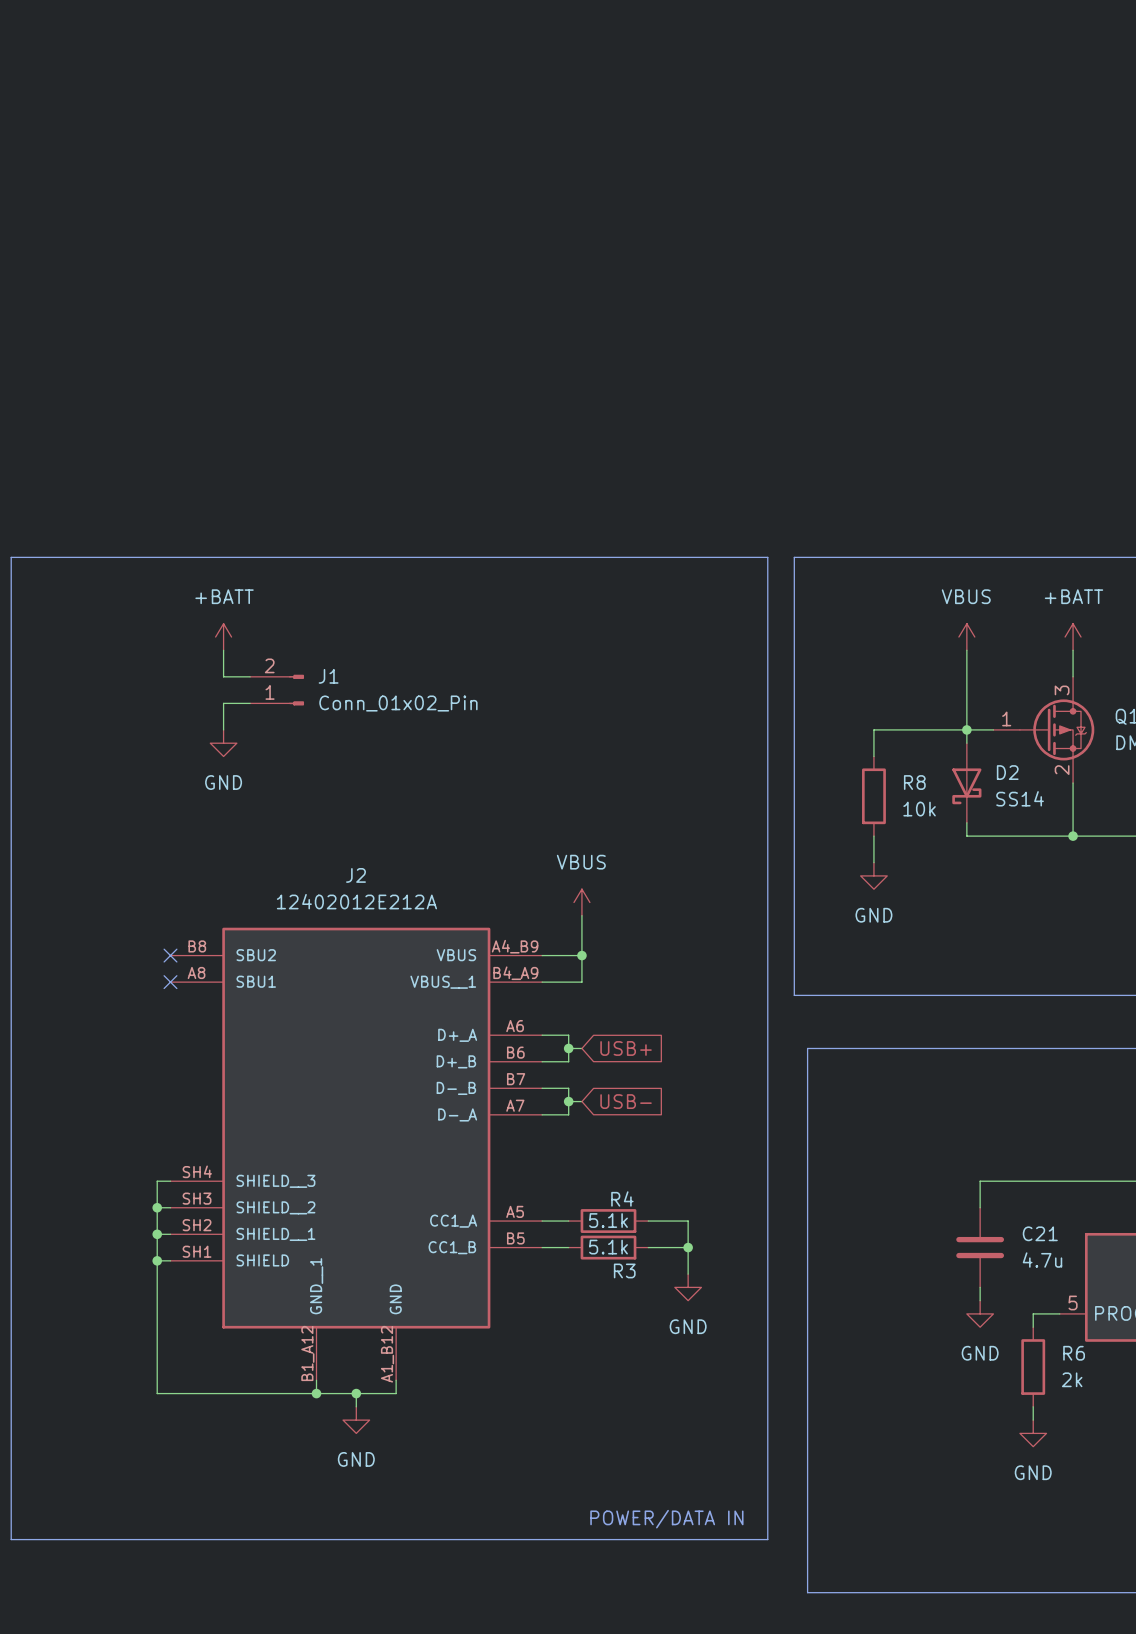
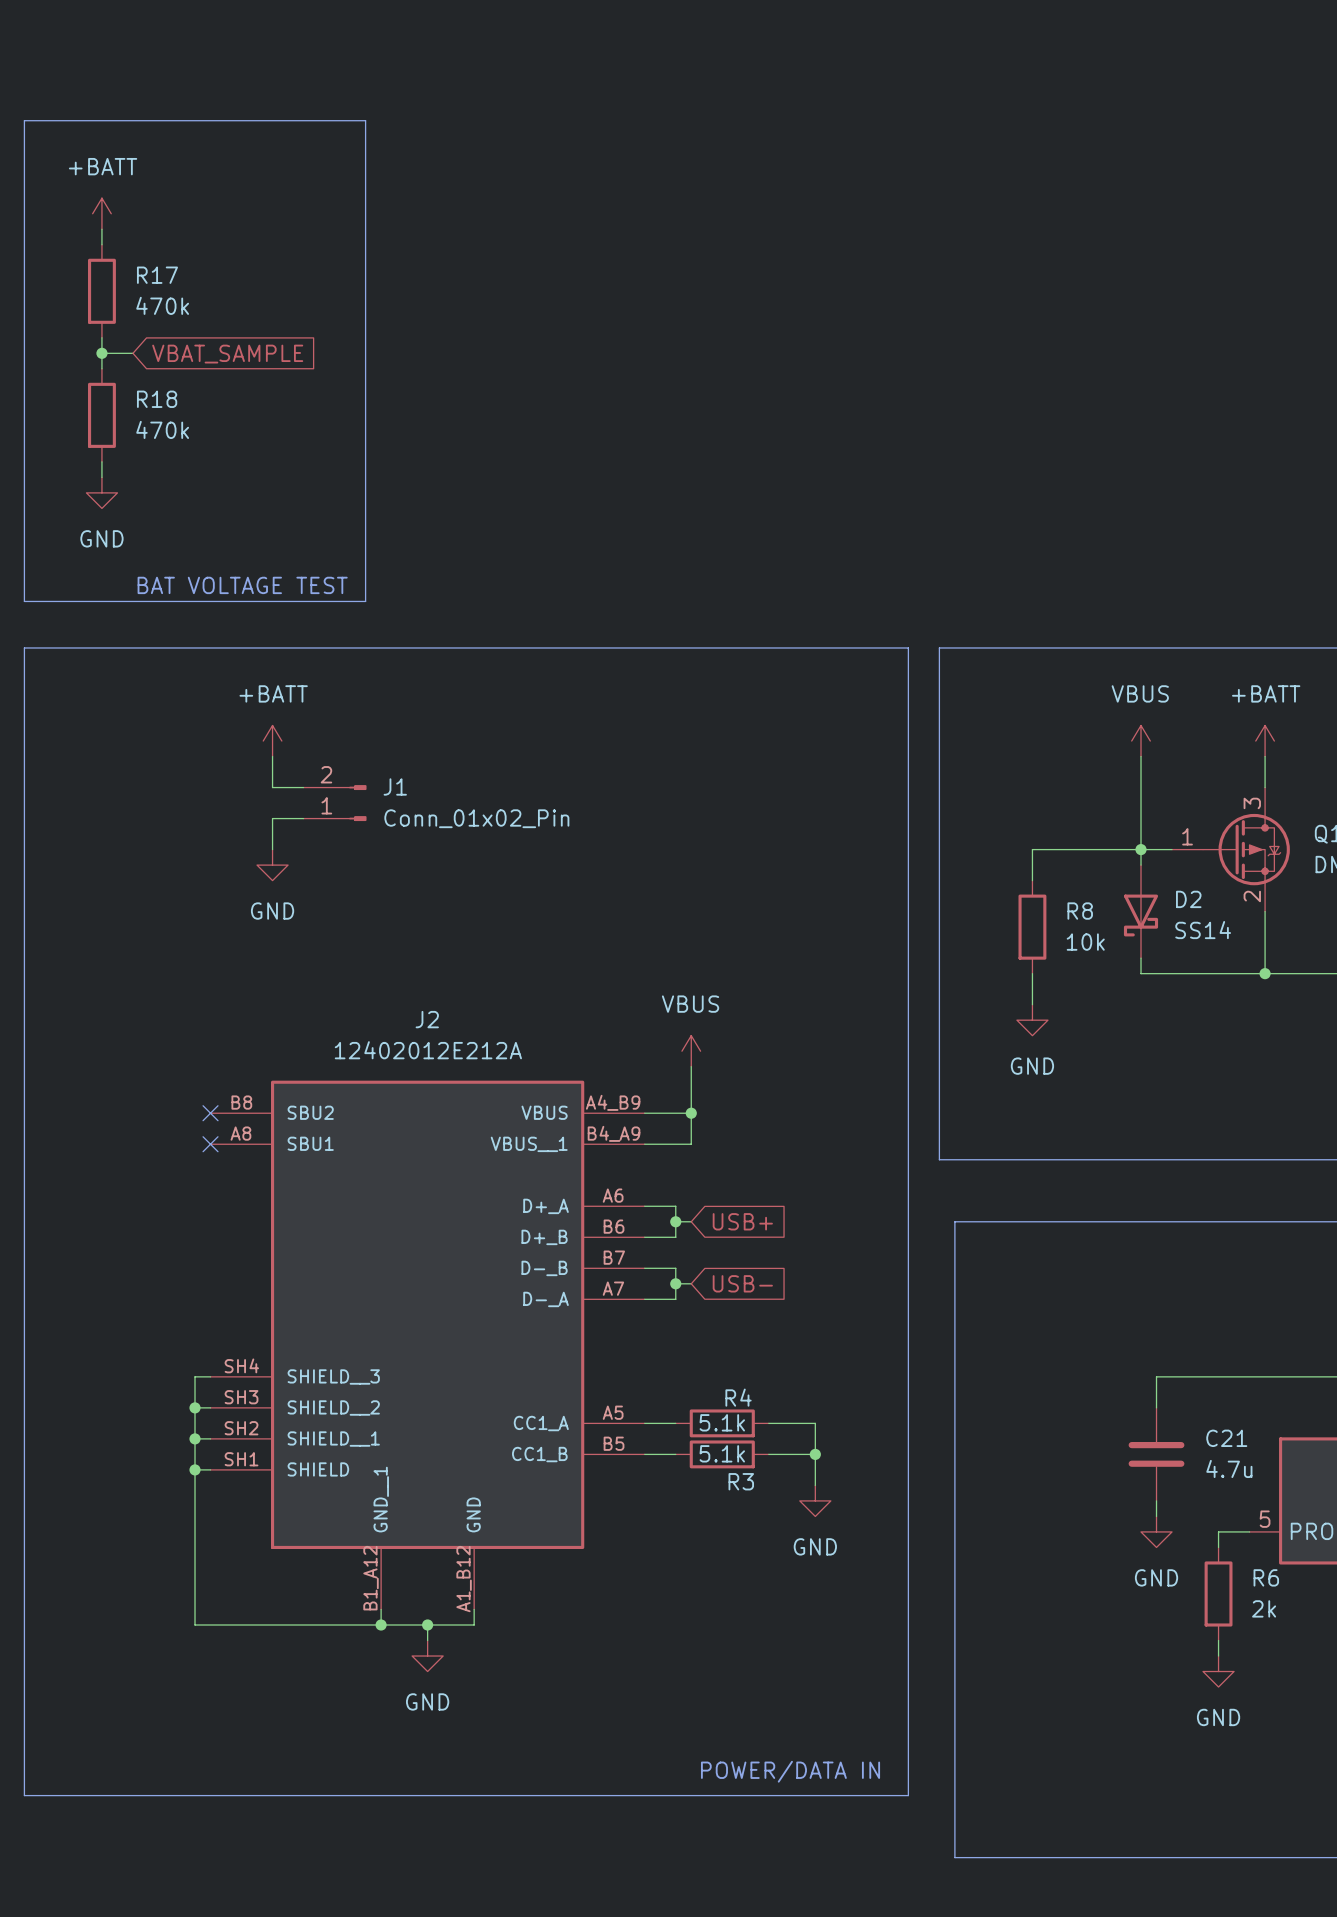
line: none -> (24, 120) (365, 120) (365, 601) (24, 601) (24, 120)
power symbol: none -> +BATT (101, 213)
wire: none -> (101, 229) (101, 244)
R17: none -> 470k (101, 291)
wire: none -> (101, 337) (101, 368)
wire: none -> (101, 353) (132, 353)
junction: none -> (101, 353)
global label: none -> VBAT_SAMPLE (227, 354)
R18: none -> 470k (101, 415)
wire: none -> (101, 461) (101, 477)
power symbol: none -> GND (101, 492)
text: none -> BAT VOLTAGE TEST (242, 585)

